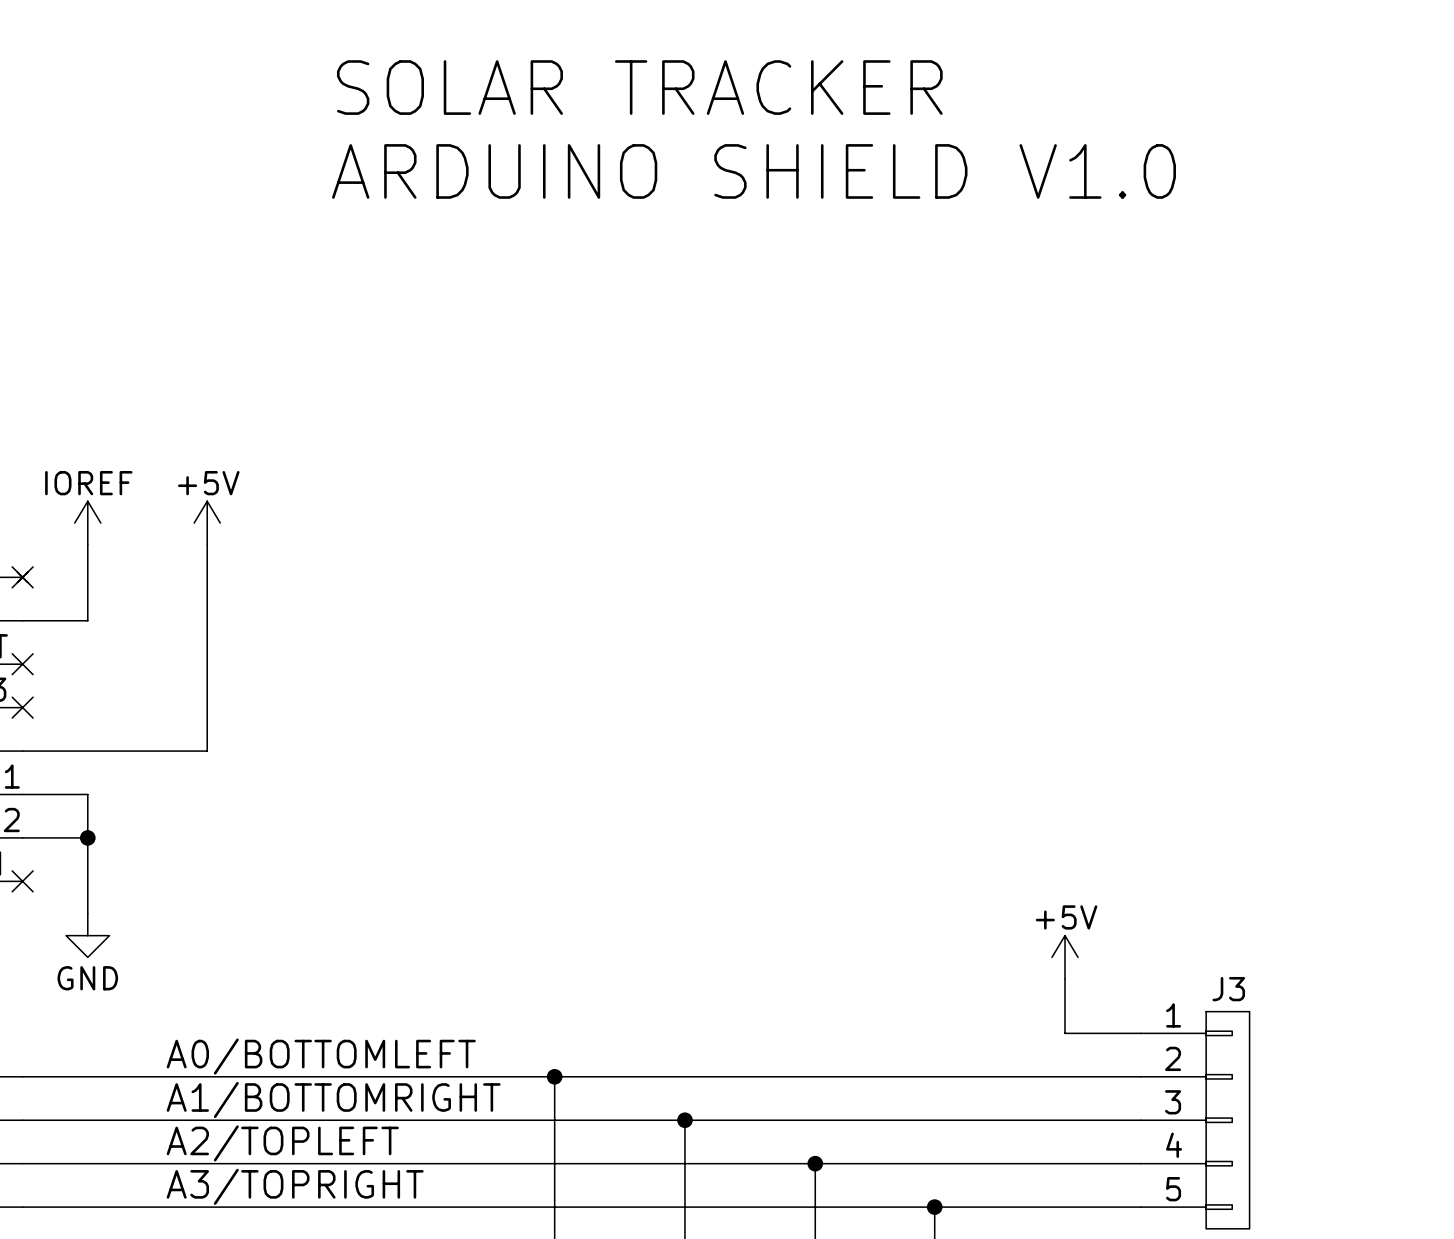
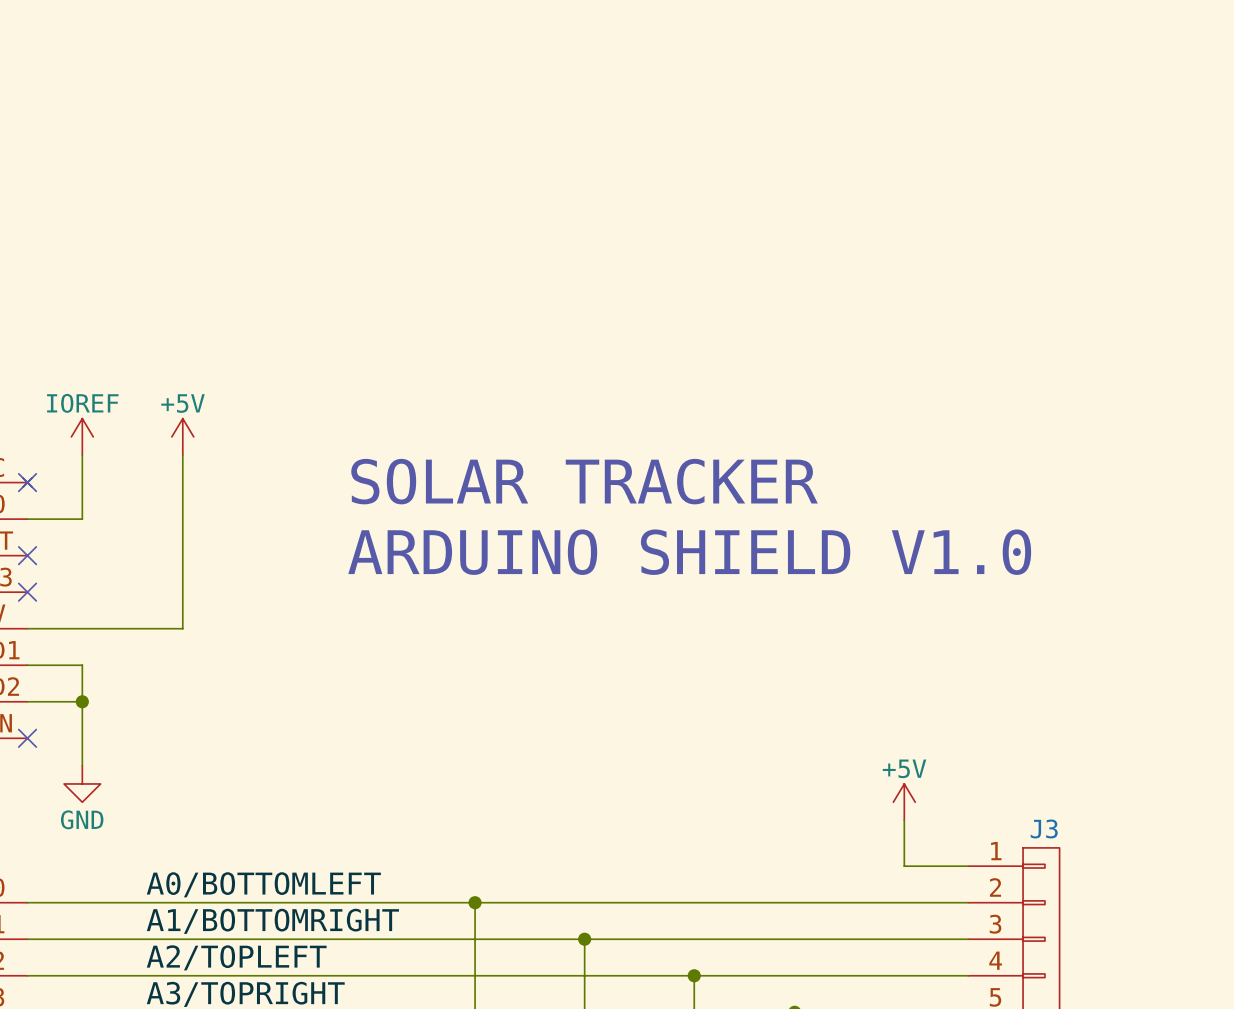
text: SOLAR TRACKER (639, 87) -> none
text: ARDUINO SHIELD V1.0 (754, 171) -> none
text: none -> SOLAR TRACKER (584, 481)
text: none -> ARDUINO SHIELD V1.0 (689, 552)

